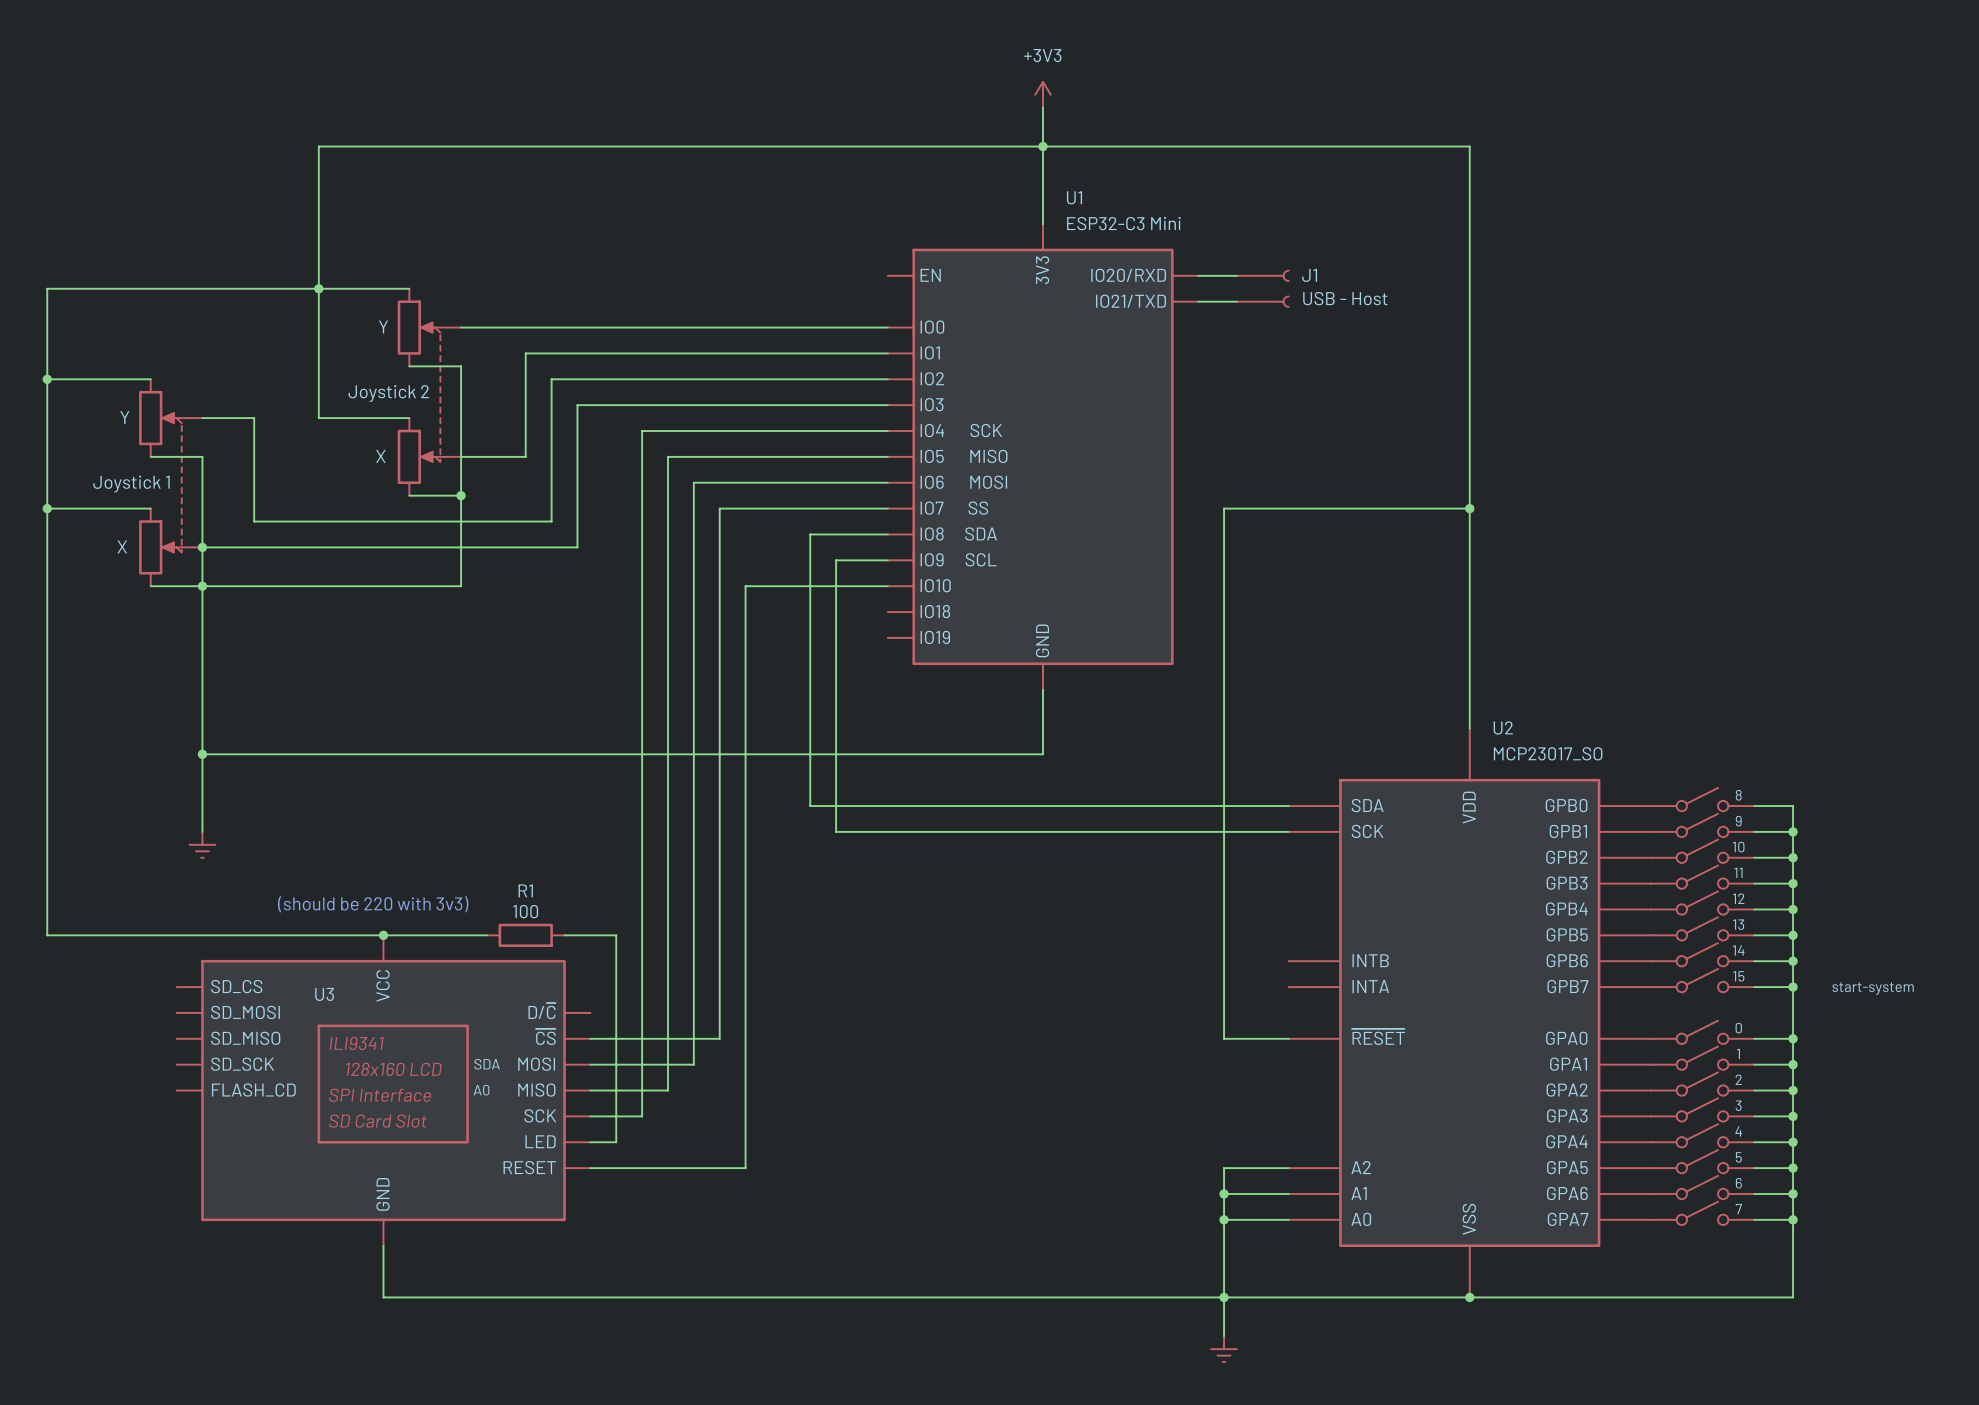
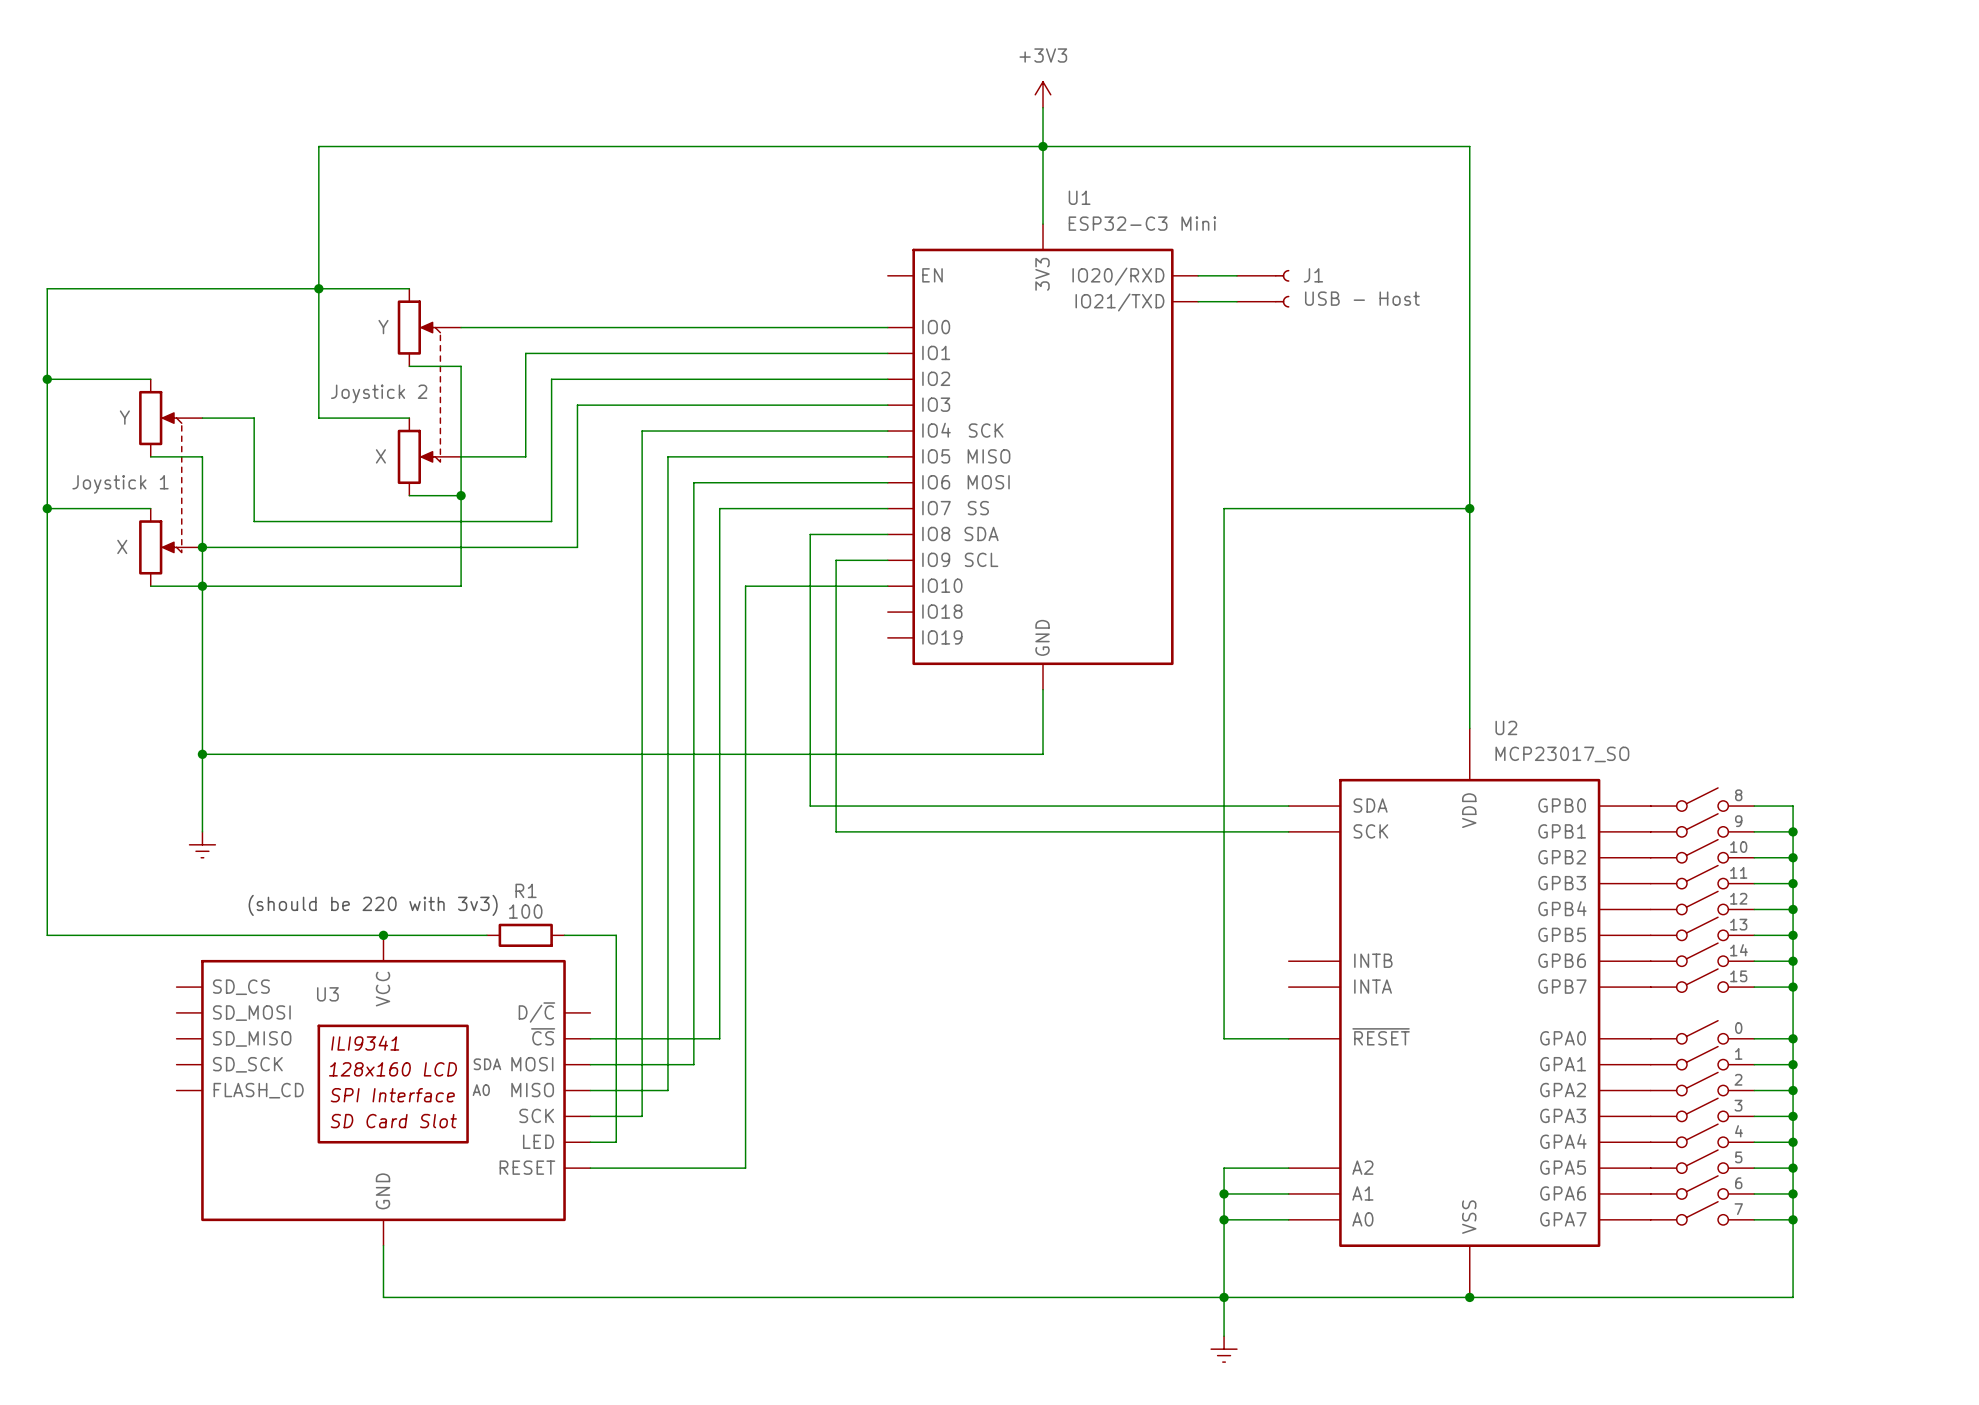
part text: start-system (1873, 988) -> none

